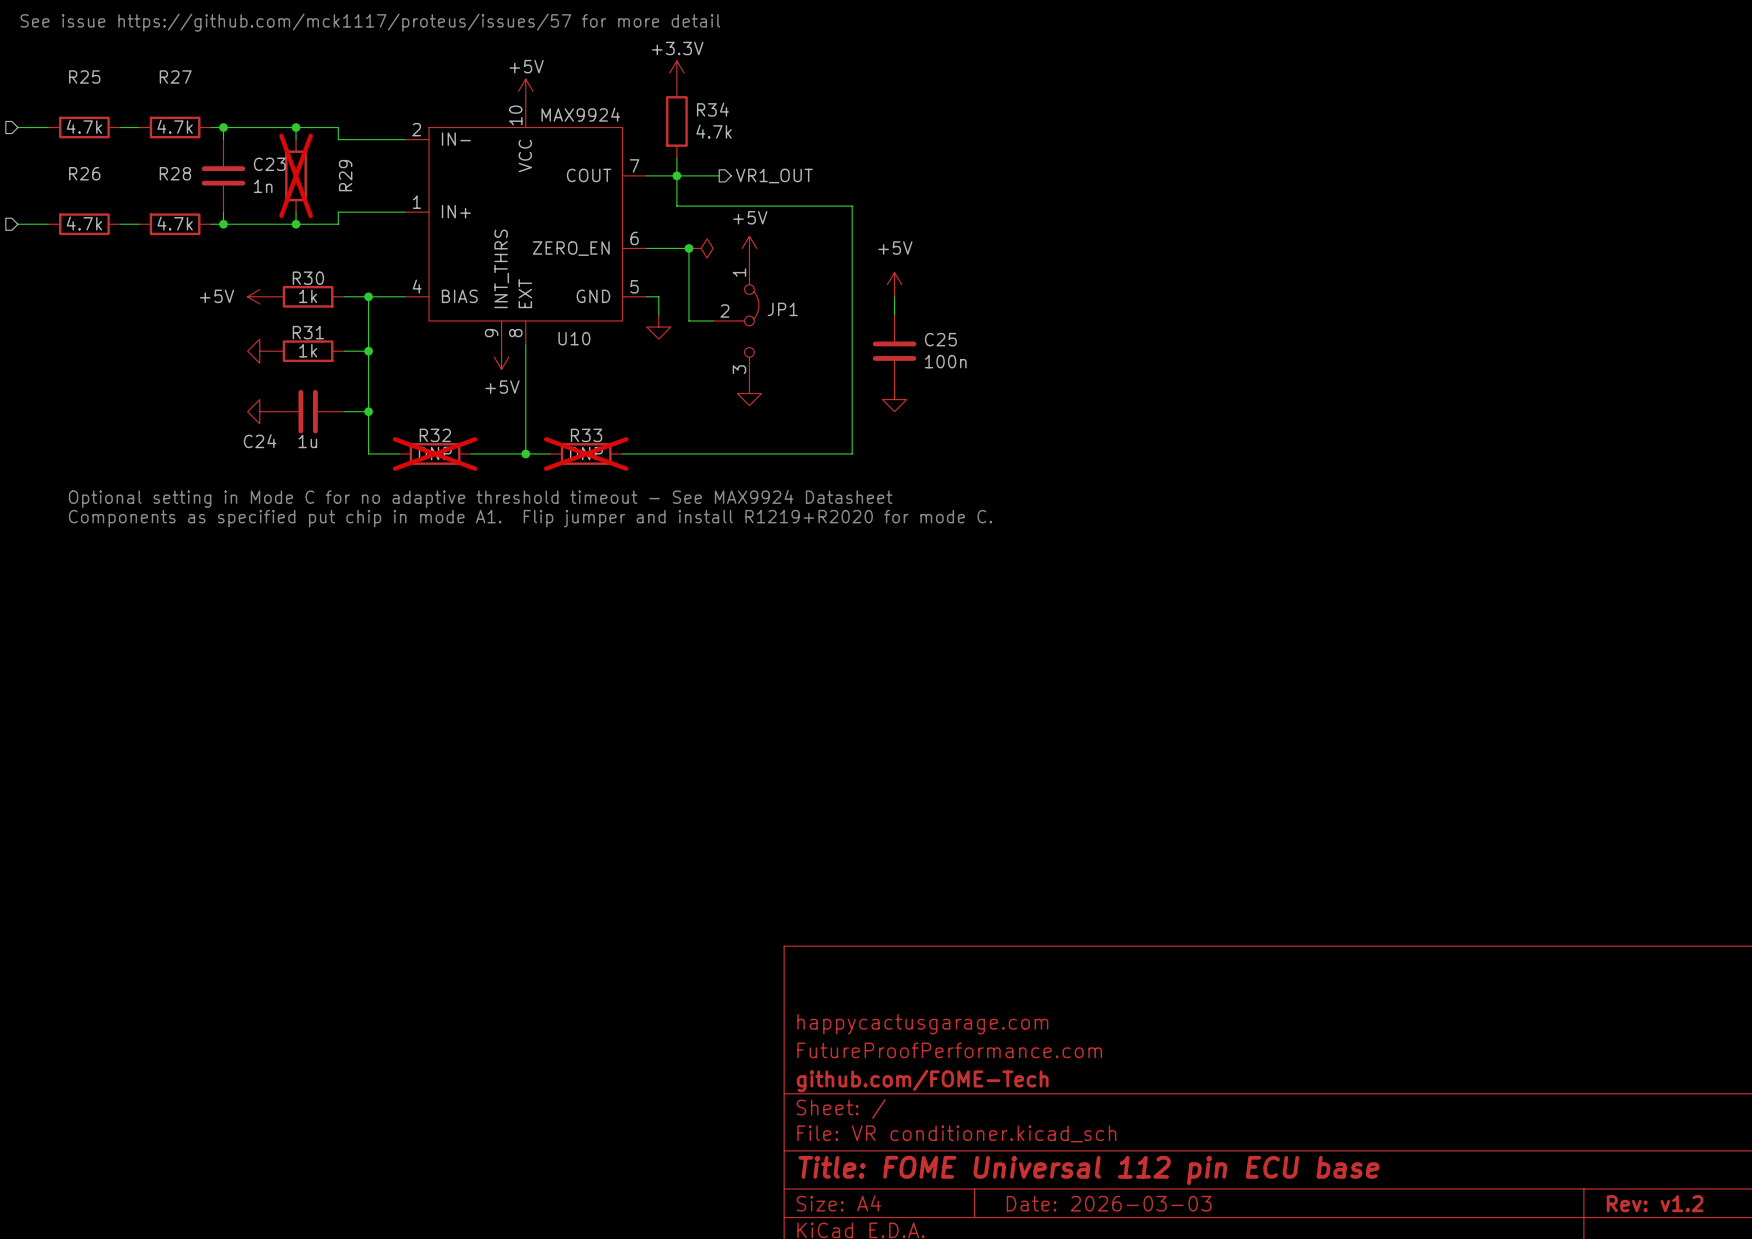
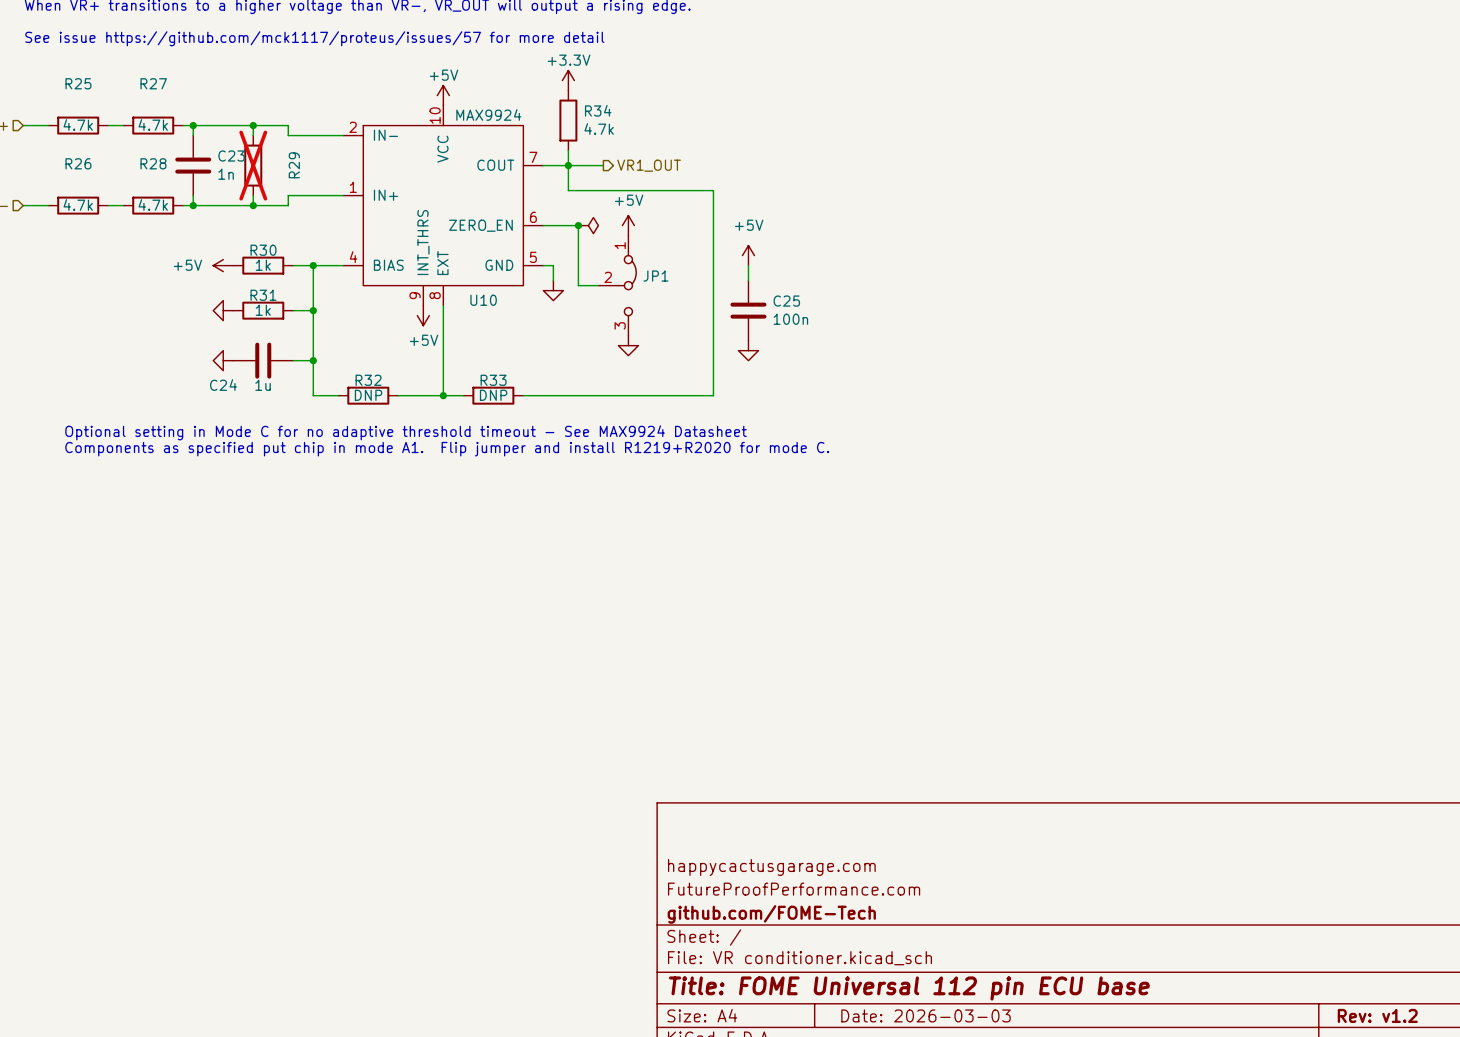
R32 do-not-place cross: (435, 453) -> none
R33 do-not-place cross: (586, 453) -> none

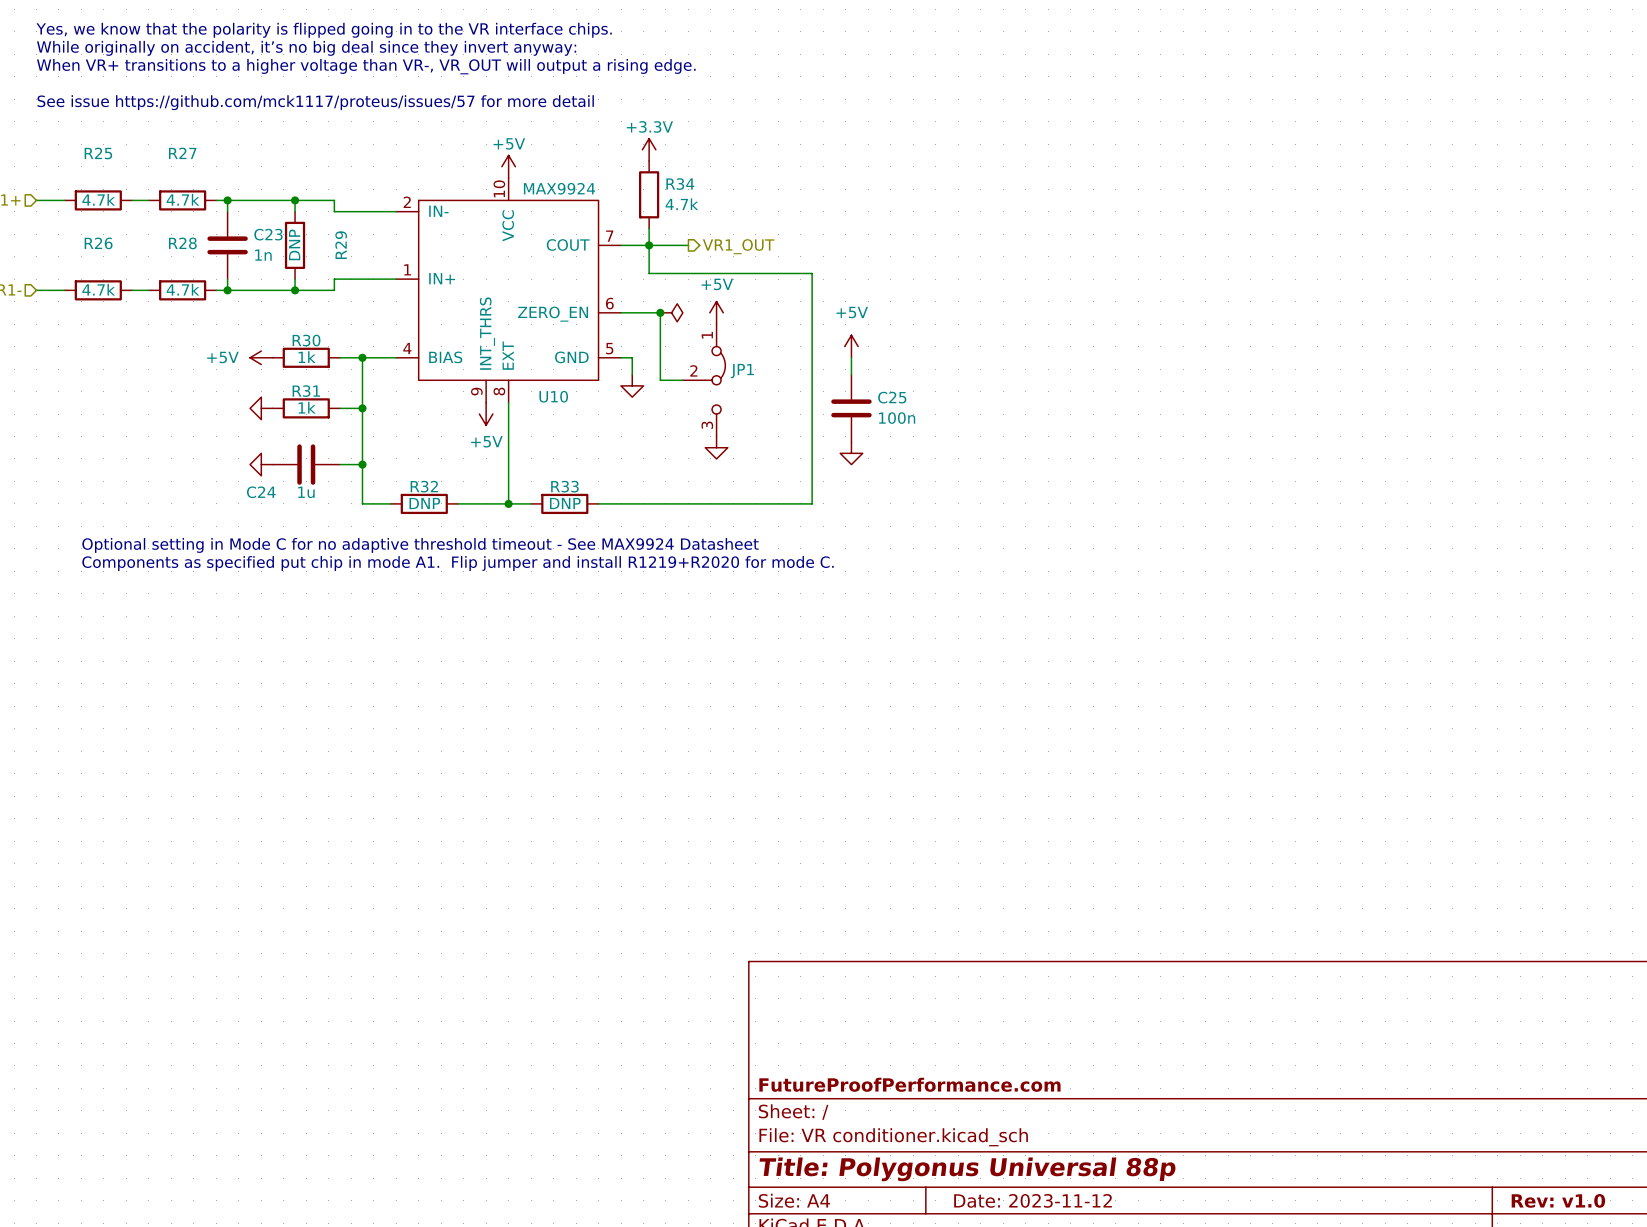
R29 value: none -> DNP (294, 244)
R29 do-not-place cross: (253, 165) -> none
title block: happycactusgarage.com (771, 867) -> none
title block: FutureProofPerformance.com (794, 889) -> none
title block: github.com/FOME-Tech (771, 914) -> FutureProofPerformance.com (909, 1084)
title block: Title: FOME Universal 112 pin ECU base (909, 988) -> Title: Polygonus Universal 88p (967, 1169)
title block: Date: 2026-03-03 (926, 1015) -> Date: 2023-11-12 (1033, 1200)
title block: Rev: v1.2 (1377, 1015) -> Rev: v1.0 (1558, 1200)

